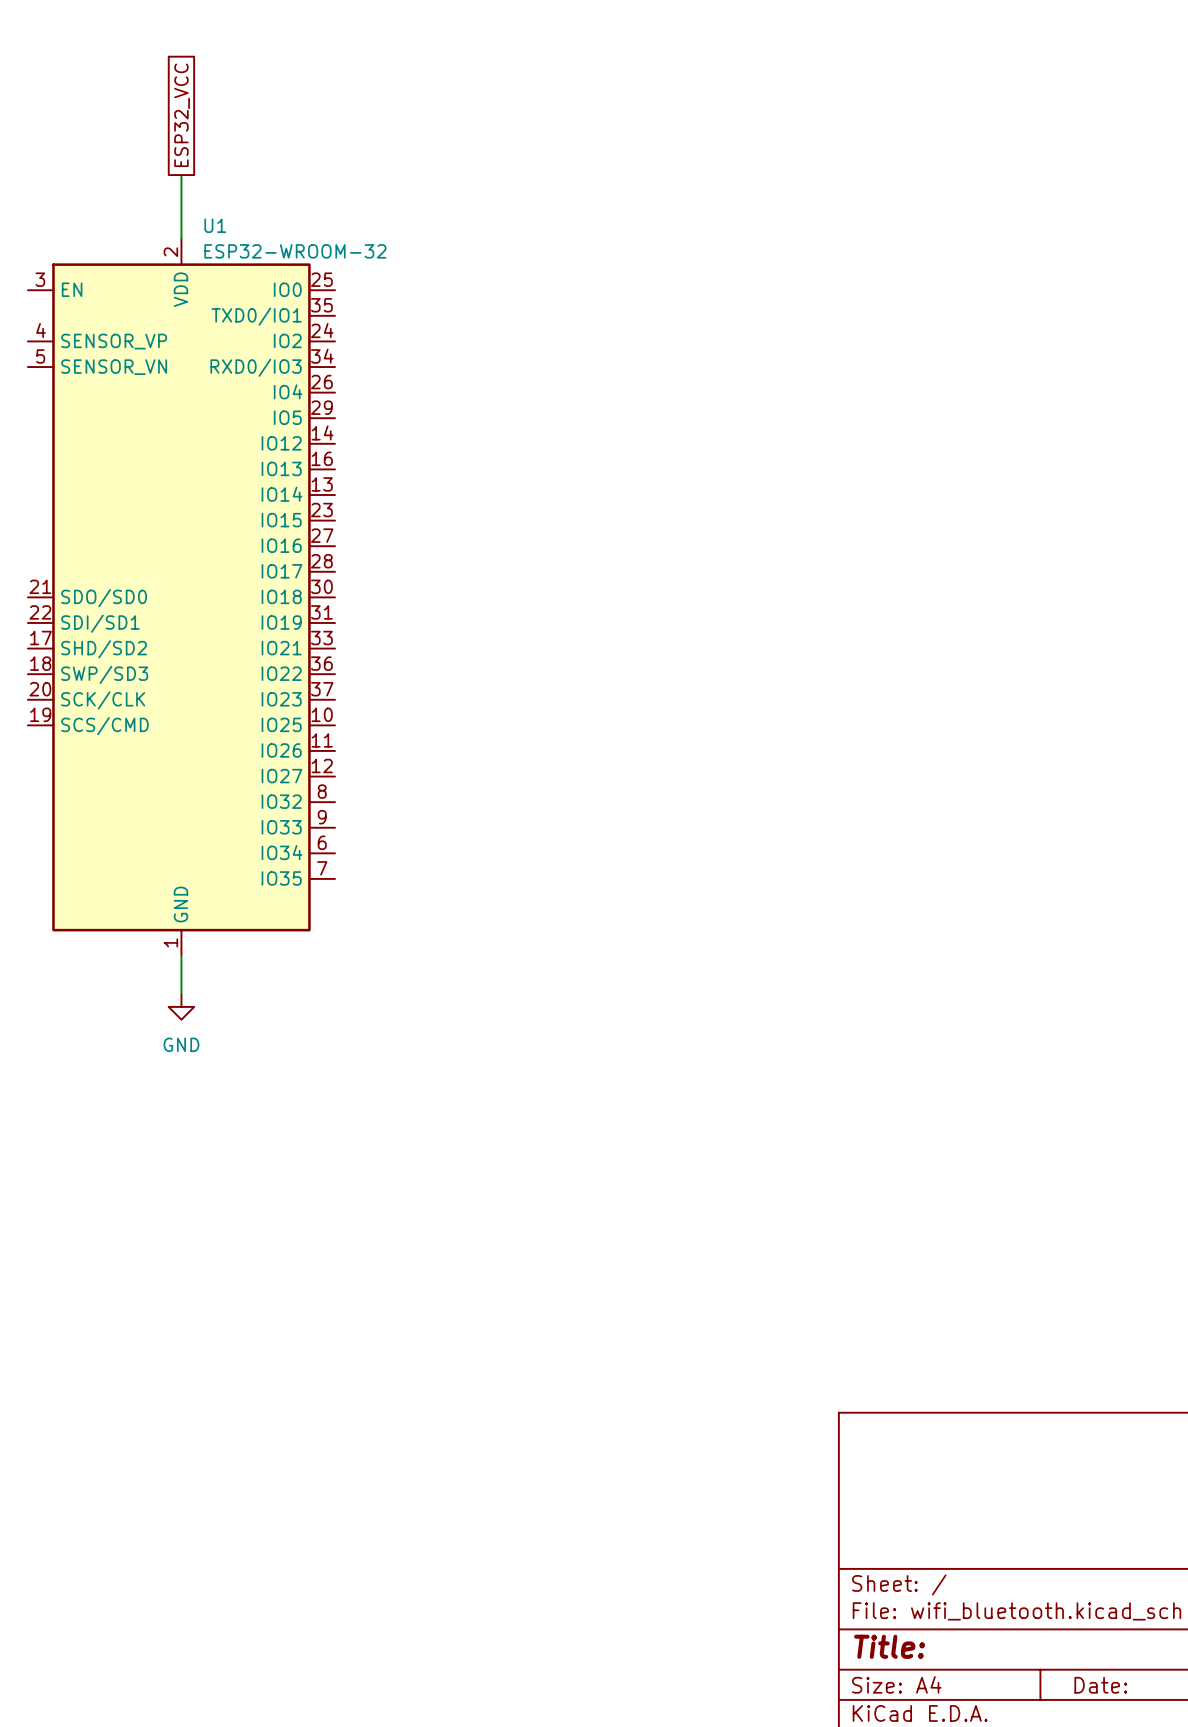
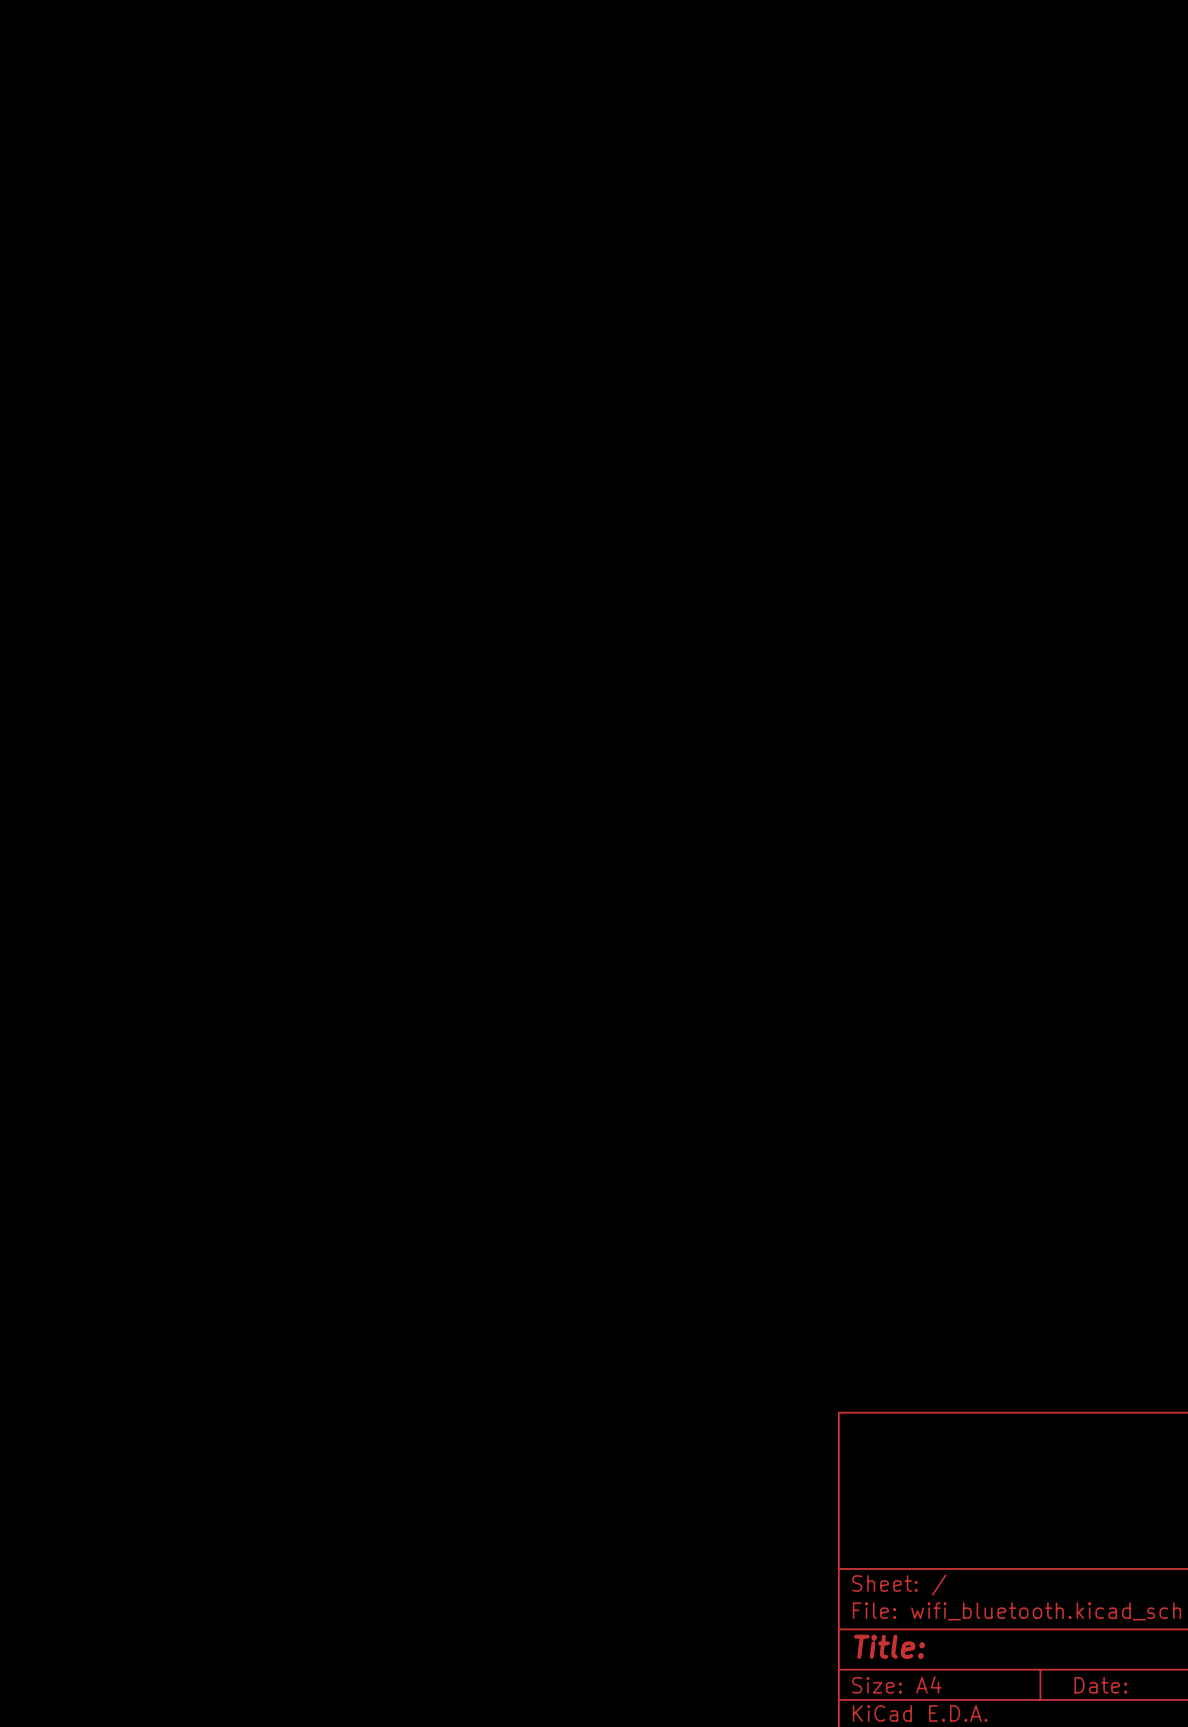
global label: ESP32_VCC (182, 115) -> none
wire: (181, 175) (181, 239) -> none
U1: ESP32-WROOM-32 (181, 597) -> none
wire: (181, 955) (181, 994) -> none
power symbol: GND (181, 1006) -> none

